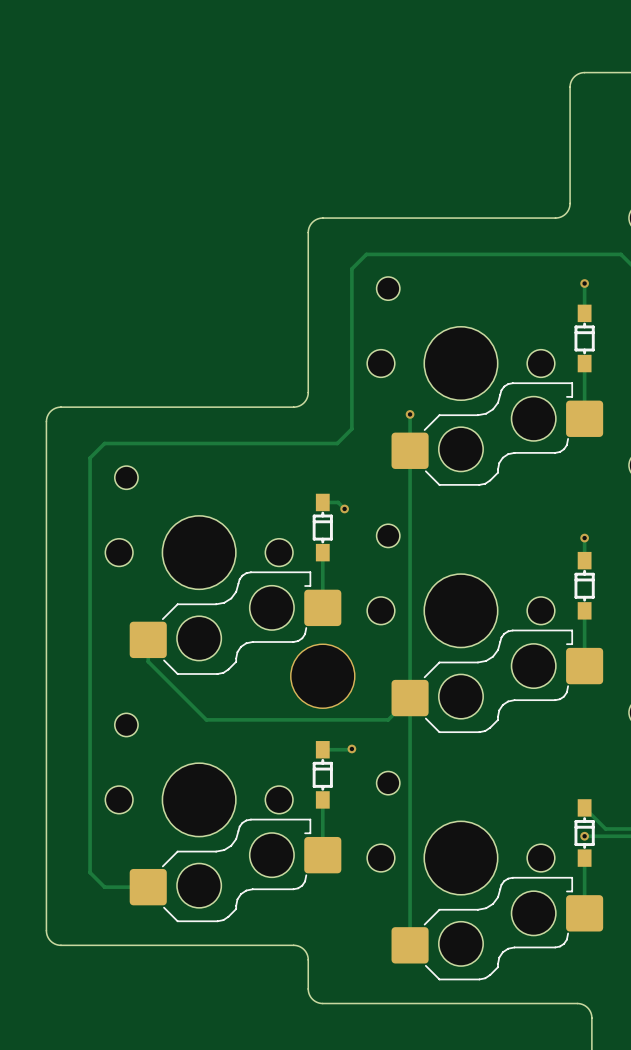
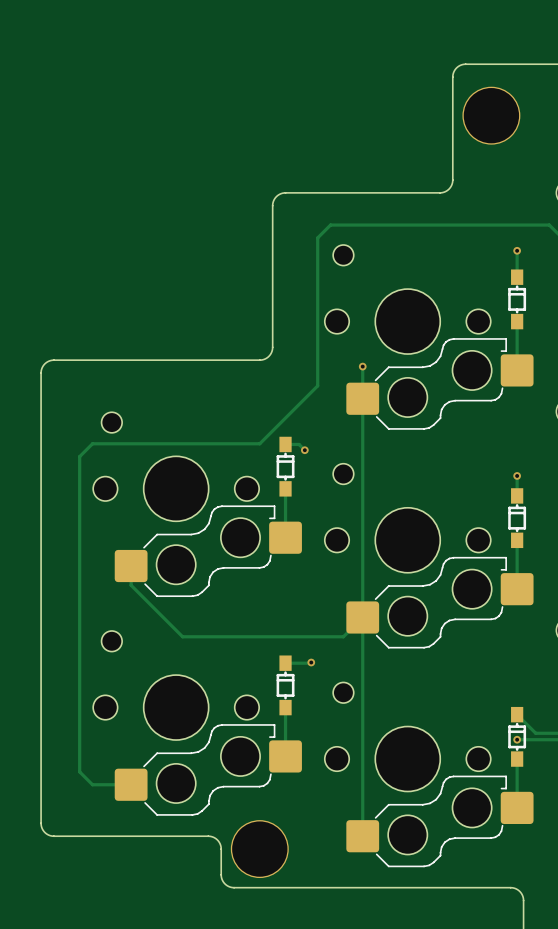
board edge: (584, 72) (574, 76) (570, 85) (570, 203) (567, 211) (557, 217) (497, 218) -> (517, 64) (464, 64) (454, 70) (452, 77) (452, 181) (449, 189) (439, 192)
part: none -> (491, 115)
track: (373, 254) (366, 254) (351, 268) (351, 428) (337, 443) (104, 443) (90, 458) (90, 516) -> (330, 225) (317, 237) (317, 385) (259, 443) (92, 443) (79, 456)
part position: (322, 676) -> (259, 849)
board edge: (235, 945) (293, 945) (301, 947) (308, 958) (309, 993) (315, 1001) (322, 1003) -> (208, 836) (215, 838) (220, 844) (221, 876) (227, 885) (234, 887) (285, 887)

